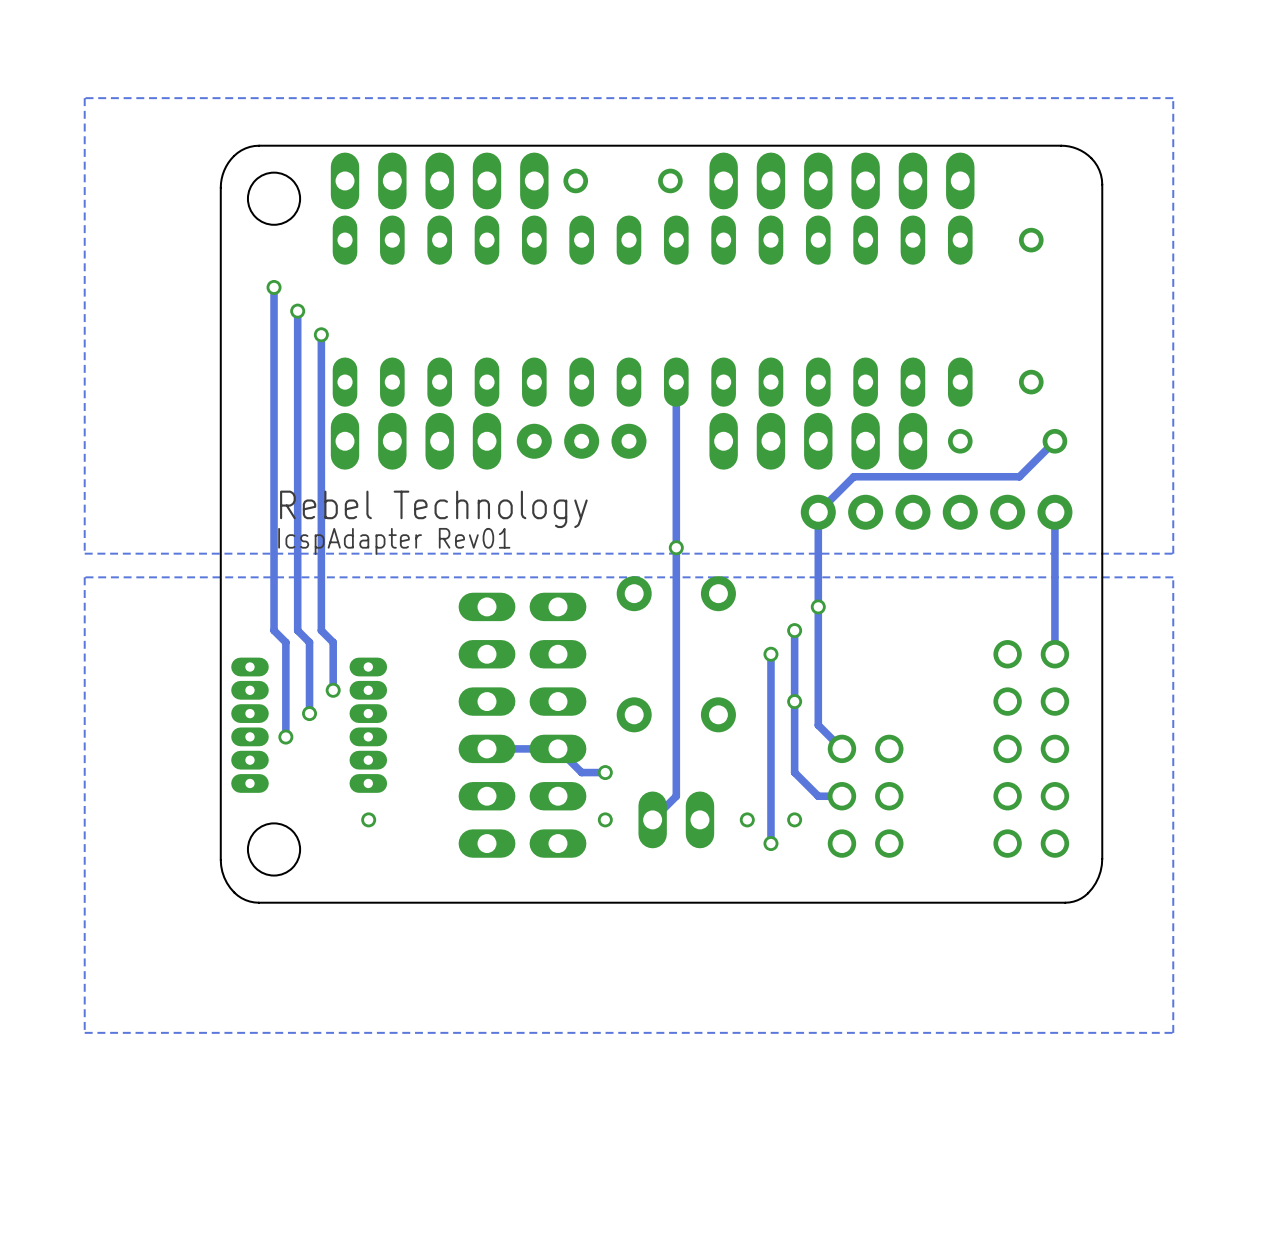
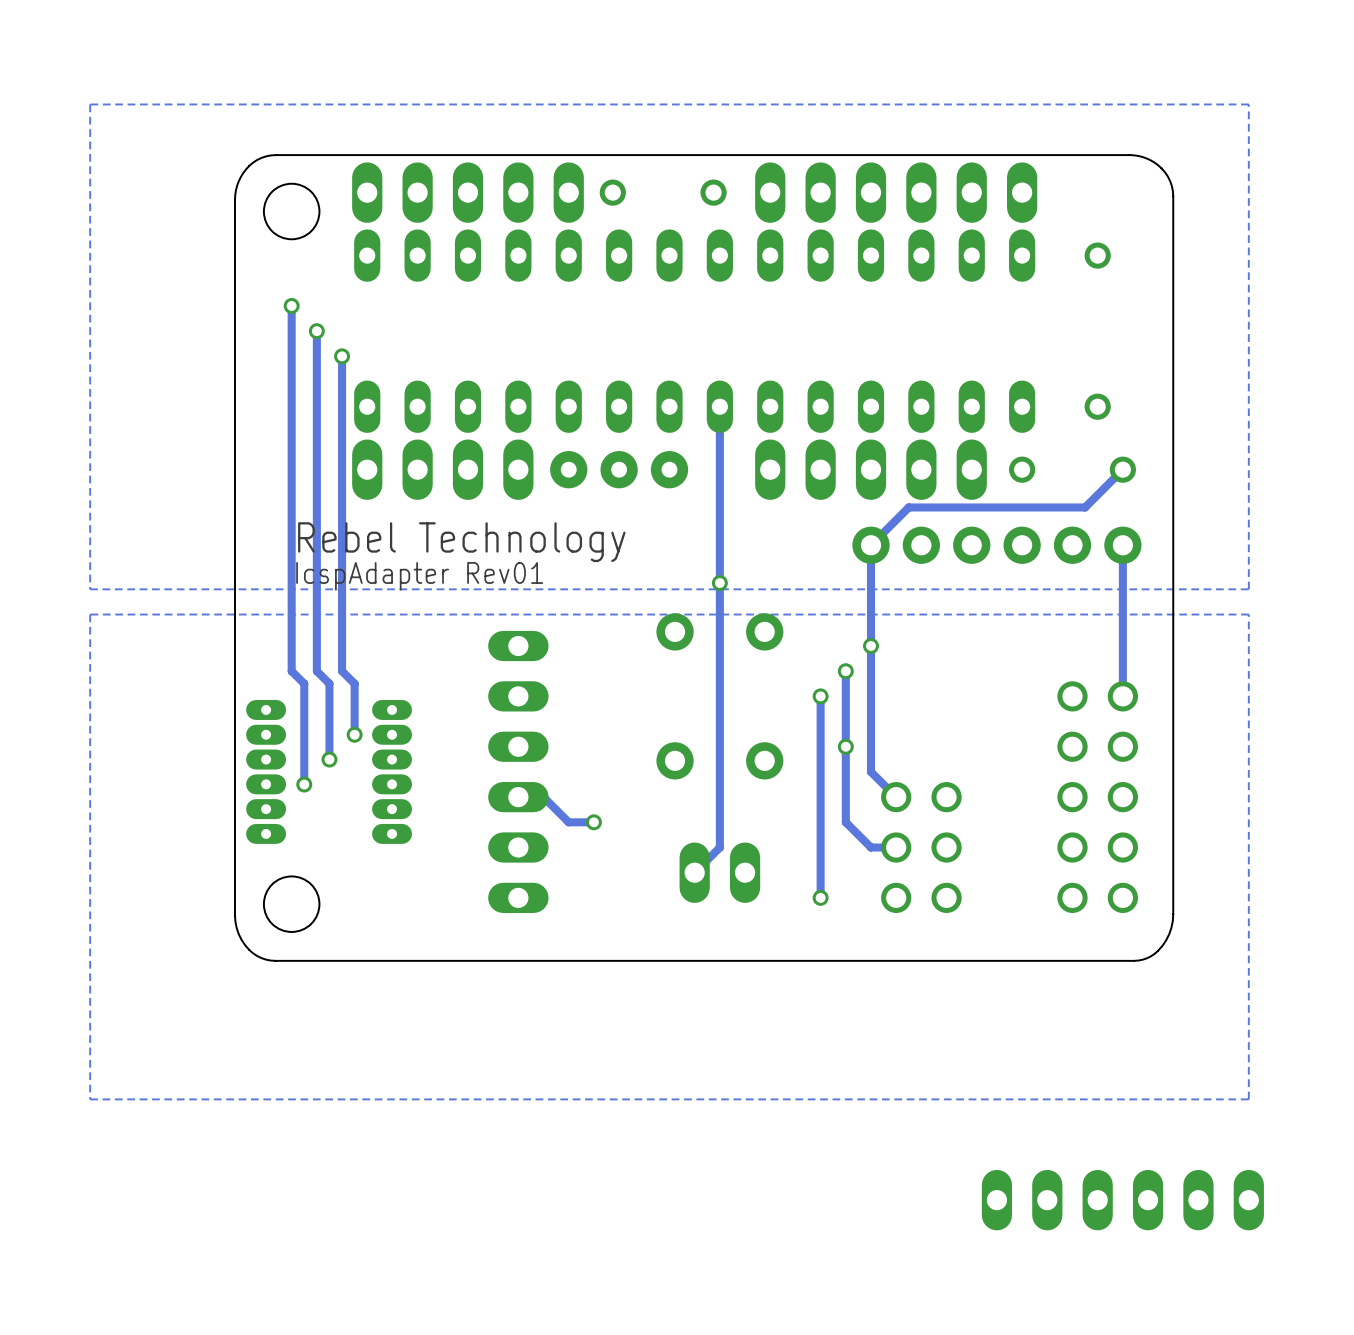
part: (557, 725) -> none
track: (510, 748) (557, 748) (581, 772) (605, 772) -> (543, 797) (568, 822) (593, 822)
via: none -> (593, 822)
via: (605, 772) -> none
via: (368, 819) -> none
via: (605, 819) -> none
via: (747, 819) -> none
via: (794, 819) -> none
part: none -> (1122, 1200)

